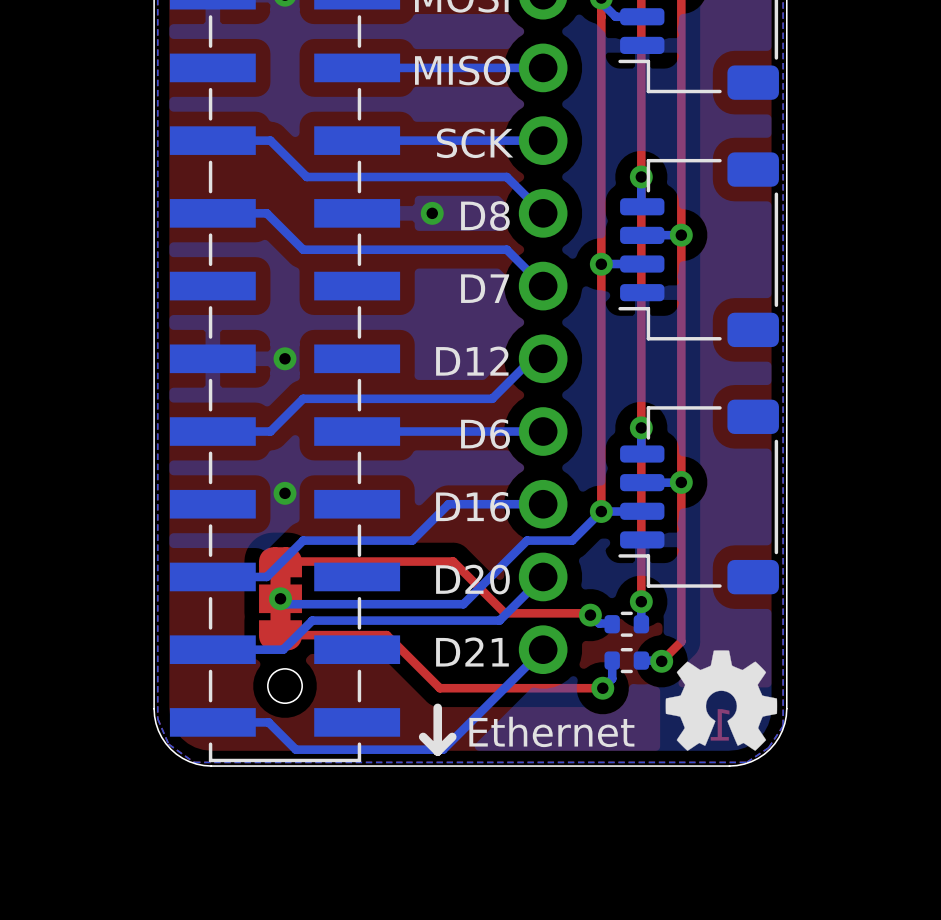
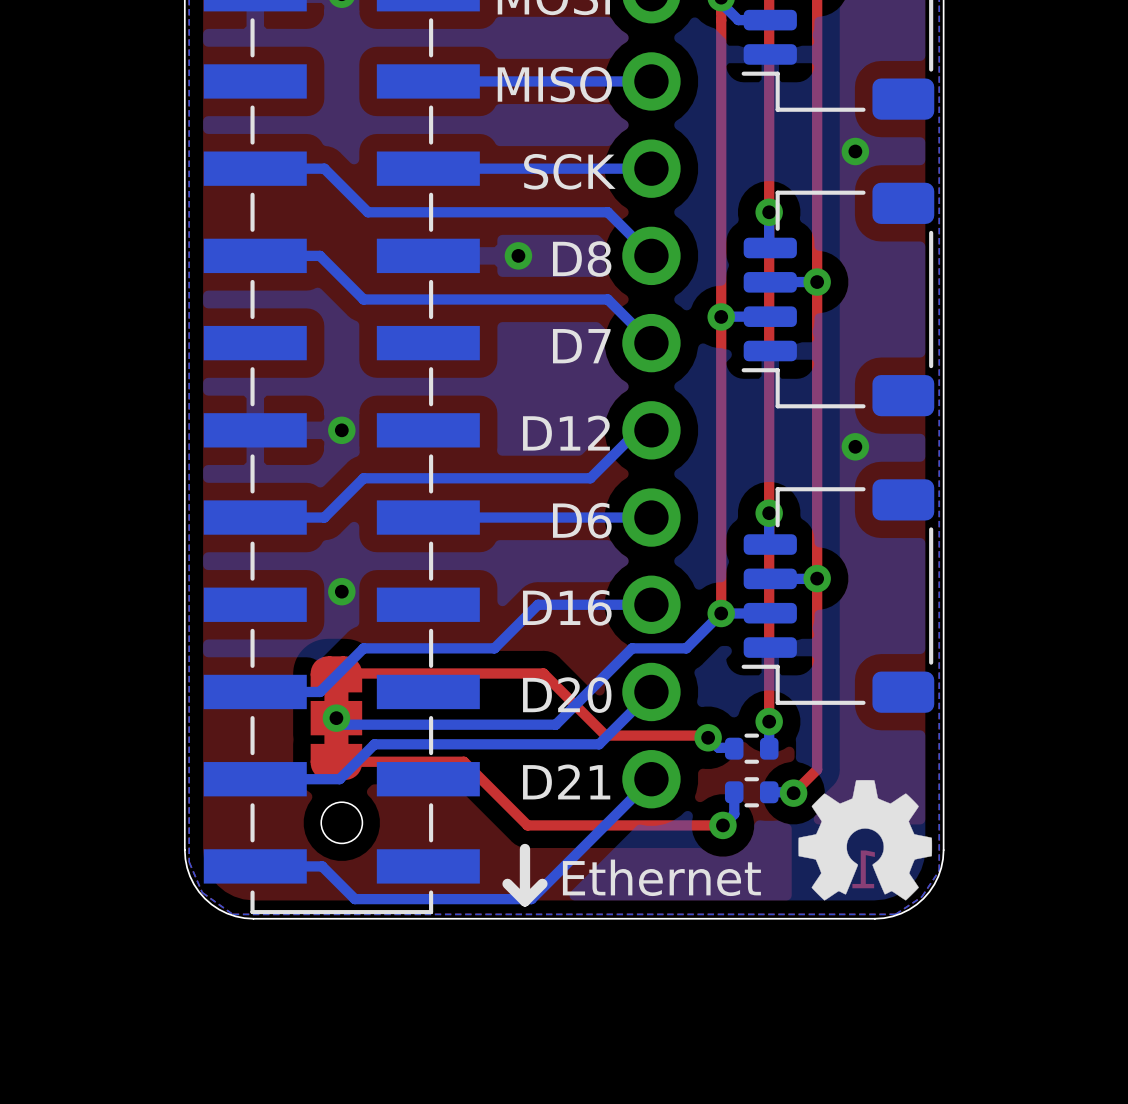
via: none -> (855, 151)
via: none -> (855, 446)

